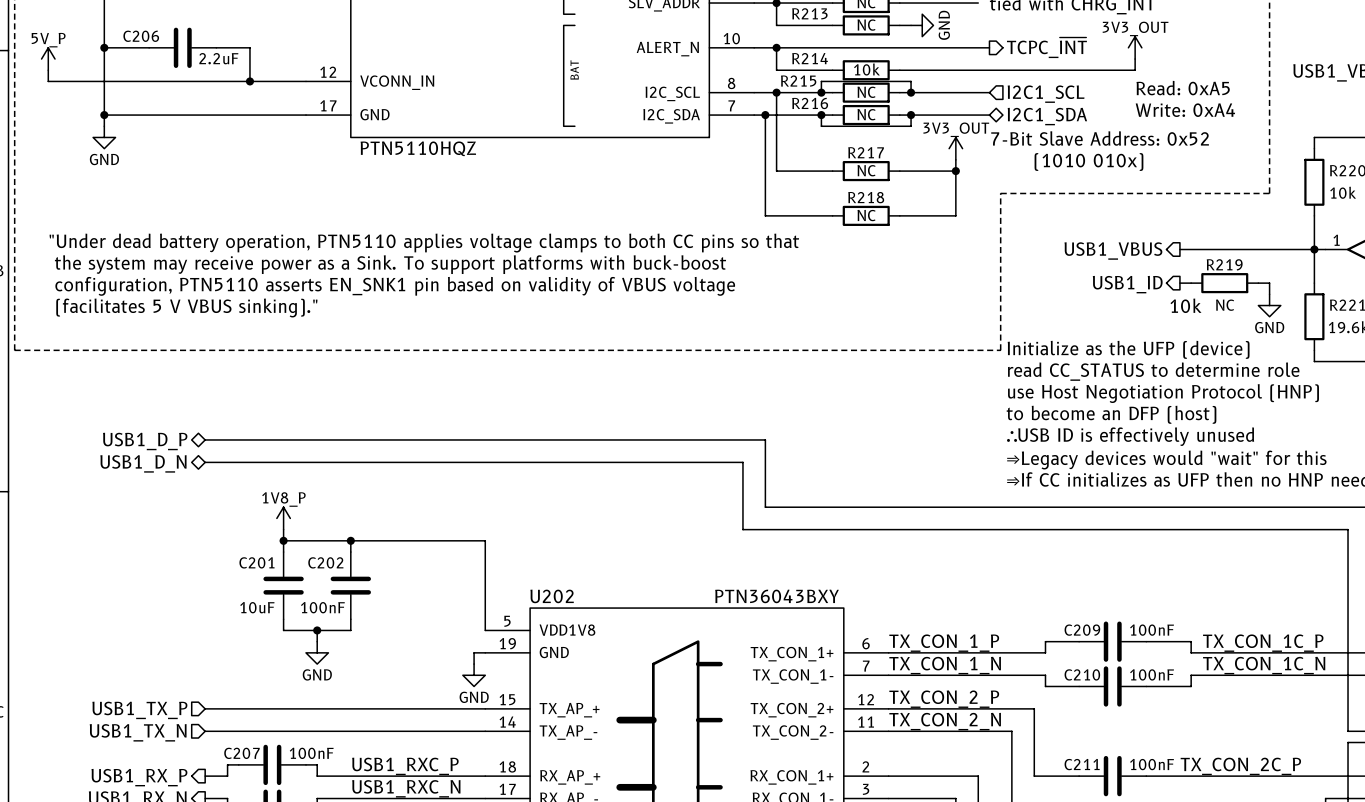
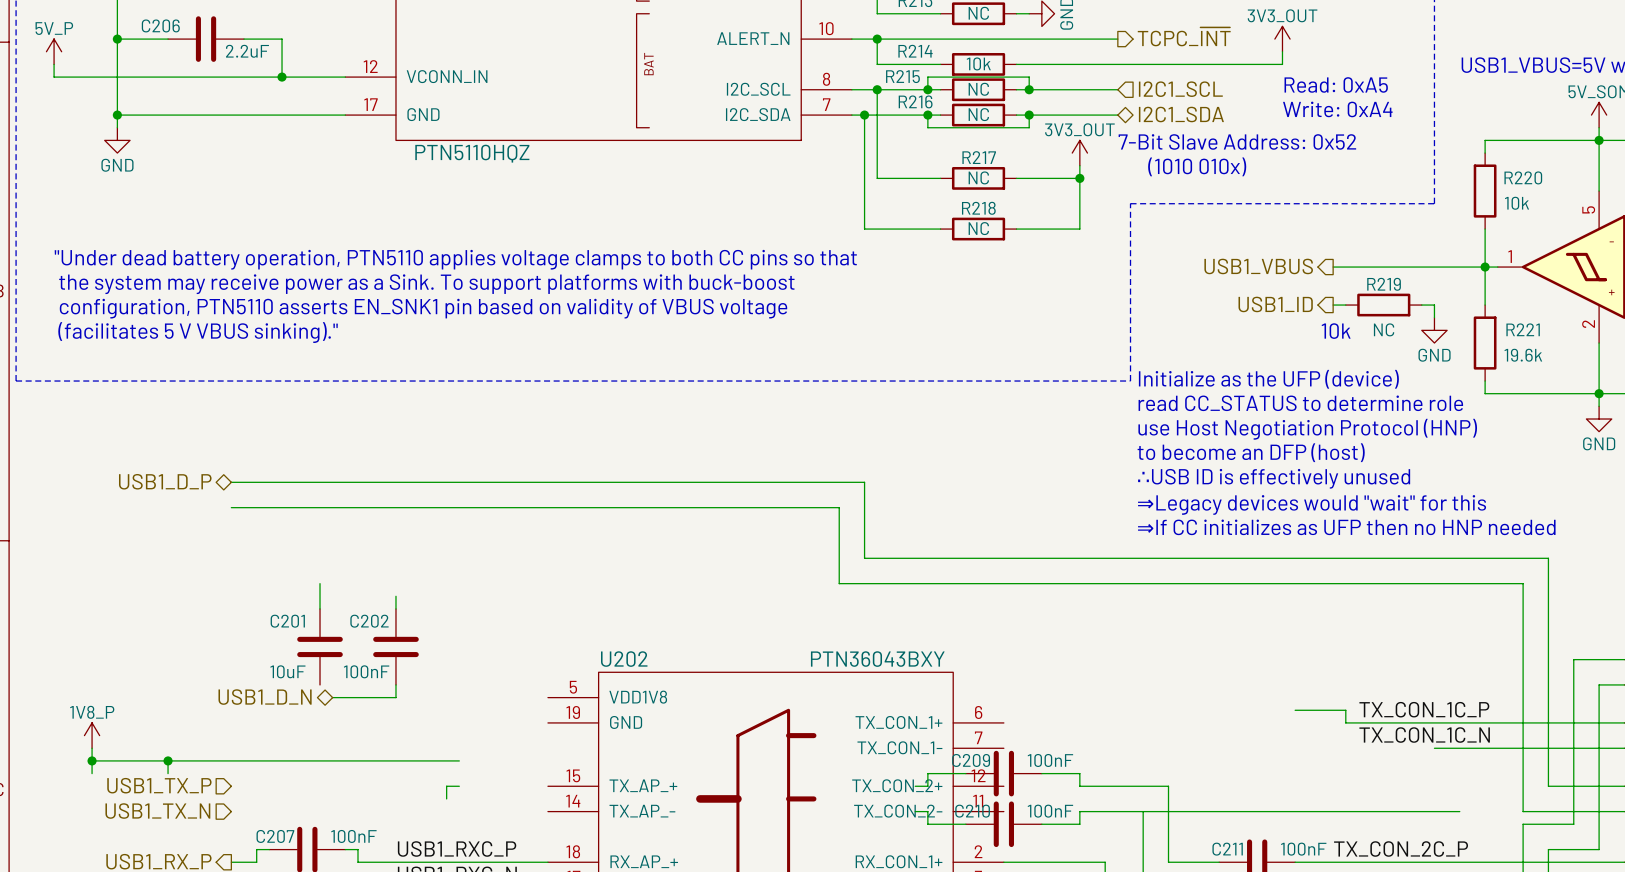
hierarchical label position: USB1_D_N (143, 463) -> USB1_D_N (265, 697)
power symbol: 1V8_P (283, 518) -> none
wire: (283, 540) (485, 540) (485, 630) -> none
junction: (283, 540) -> none
junction: (350, 540) -> none
wire: (283, 619) (283, 630) (294, 630) -> none
wire: (317, 630) (317, 641) -> (168, 760) (168, 773)
junction: (317, 630) -> none
wire: (1079, 641) (1045, 641) (1045, 652) (888, 652) -> none
C209 position: (1112, 641) -> (1003, 773)
label: TX_CON_1_P (944, 643) -> none
power symbol: GND (317, 652) -> none
wire: (485, 652) (474, 652) (474, 664) -> none
power symbol: none -> 1V8_P (92, 735)
label: TX_CON_1_N (945, 665) -> none
wire: none -> (92, 748) (92, 773)
power symbol: GND (474, 675) -> none
wire: (888, 675) (1045, 675) (1045, 686) (1079, 686) -> none
wire: (1269, 675) (1191, 675) (1191, 686) (1146, 686) -> none
wire: none -> (92, 760) (459, 760)
junction: none -> (92, 760)
junction: none -> (168, 760)
C210 position: (1112, 686) -> (1003, 824)
wire: none -> (965, 773) (927, 773) (927, 786) (915, 786)
label: TX_CON_2_P (944, 699) -> none
wire: (205, 708) (395, 708) -> (446, 798) (446, 786)
wire: (406, 708) (485, 708) -> none
wire: (888, 708) (955, 708) -> (1041, 773) (1079, 773) (1079, 786)
label: TX_CON_2_N (945, 721) -> none
wire: (205, 731) (485, 731) -> none
wire: none -> (915, 811) (927, 811) (927, 824) (965, 824)
wire: (888, 731) (955, 731) -> (1041, 824) (1079, 824) (1079, 811)
wire: none -> (1143, 811) (1459, 811)

